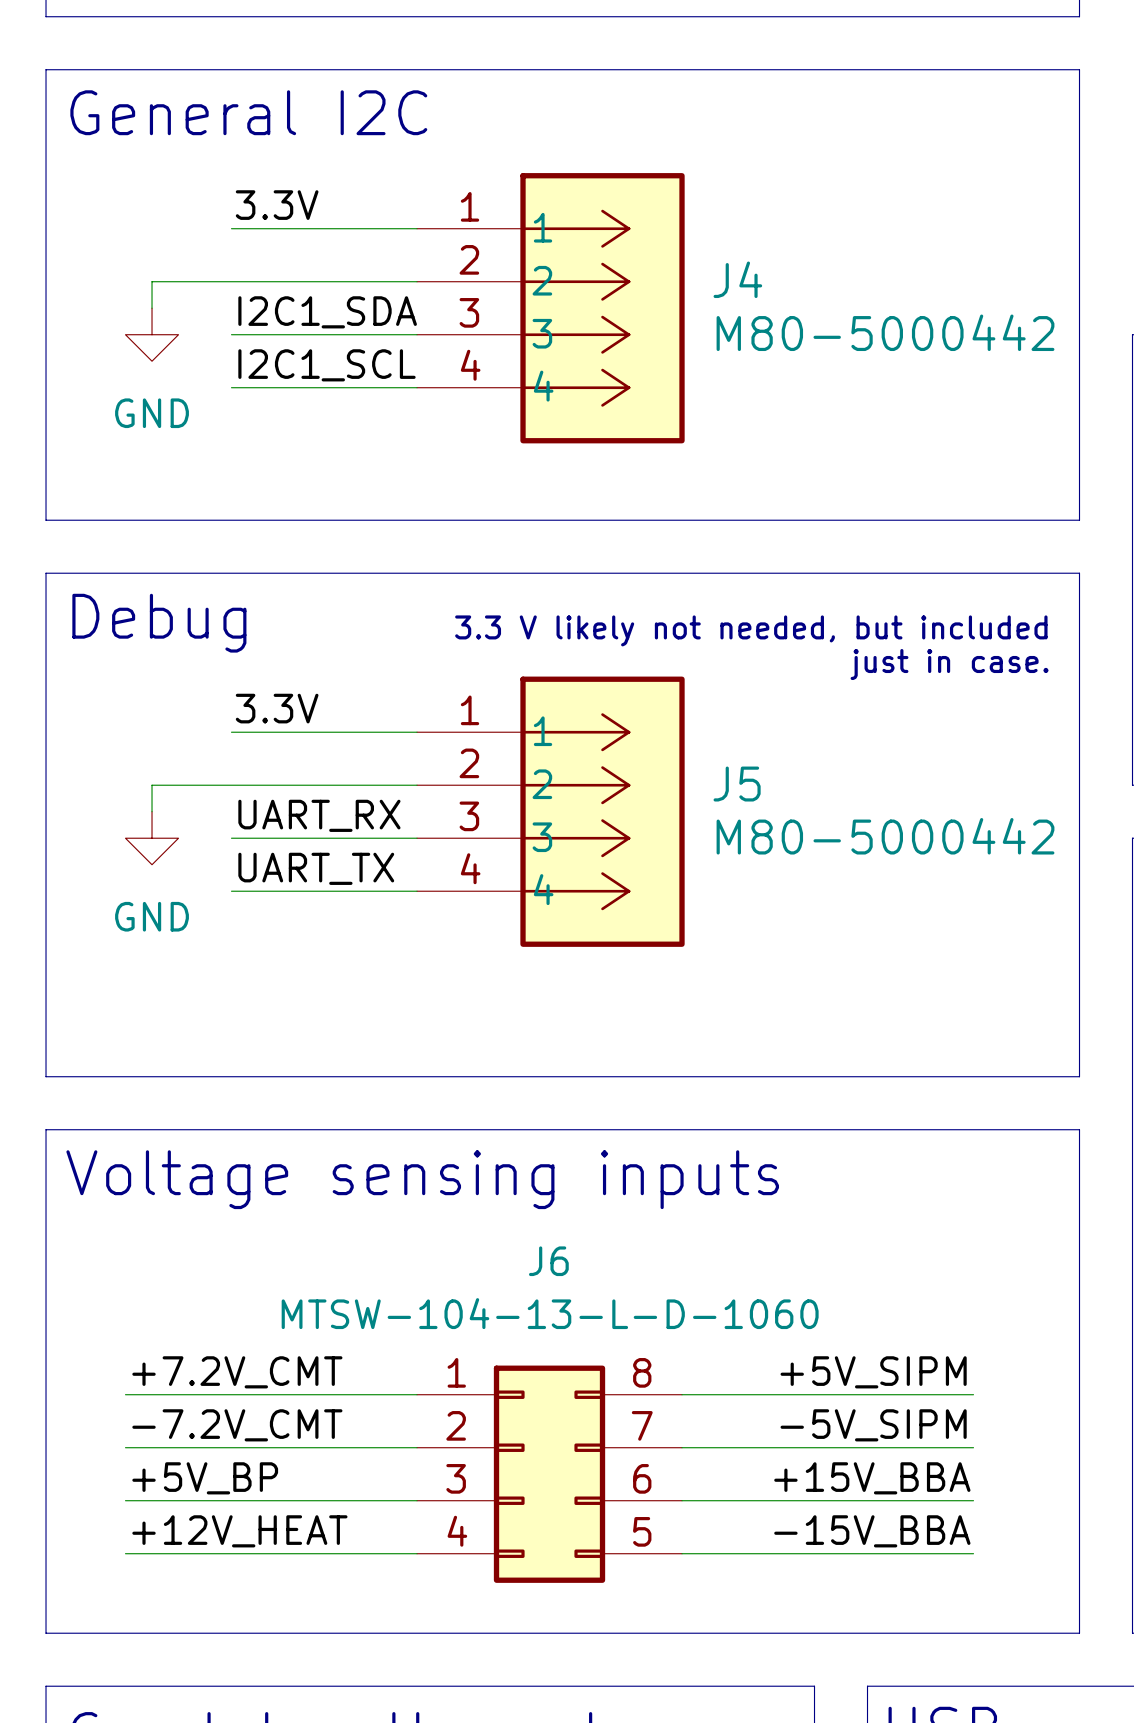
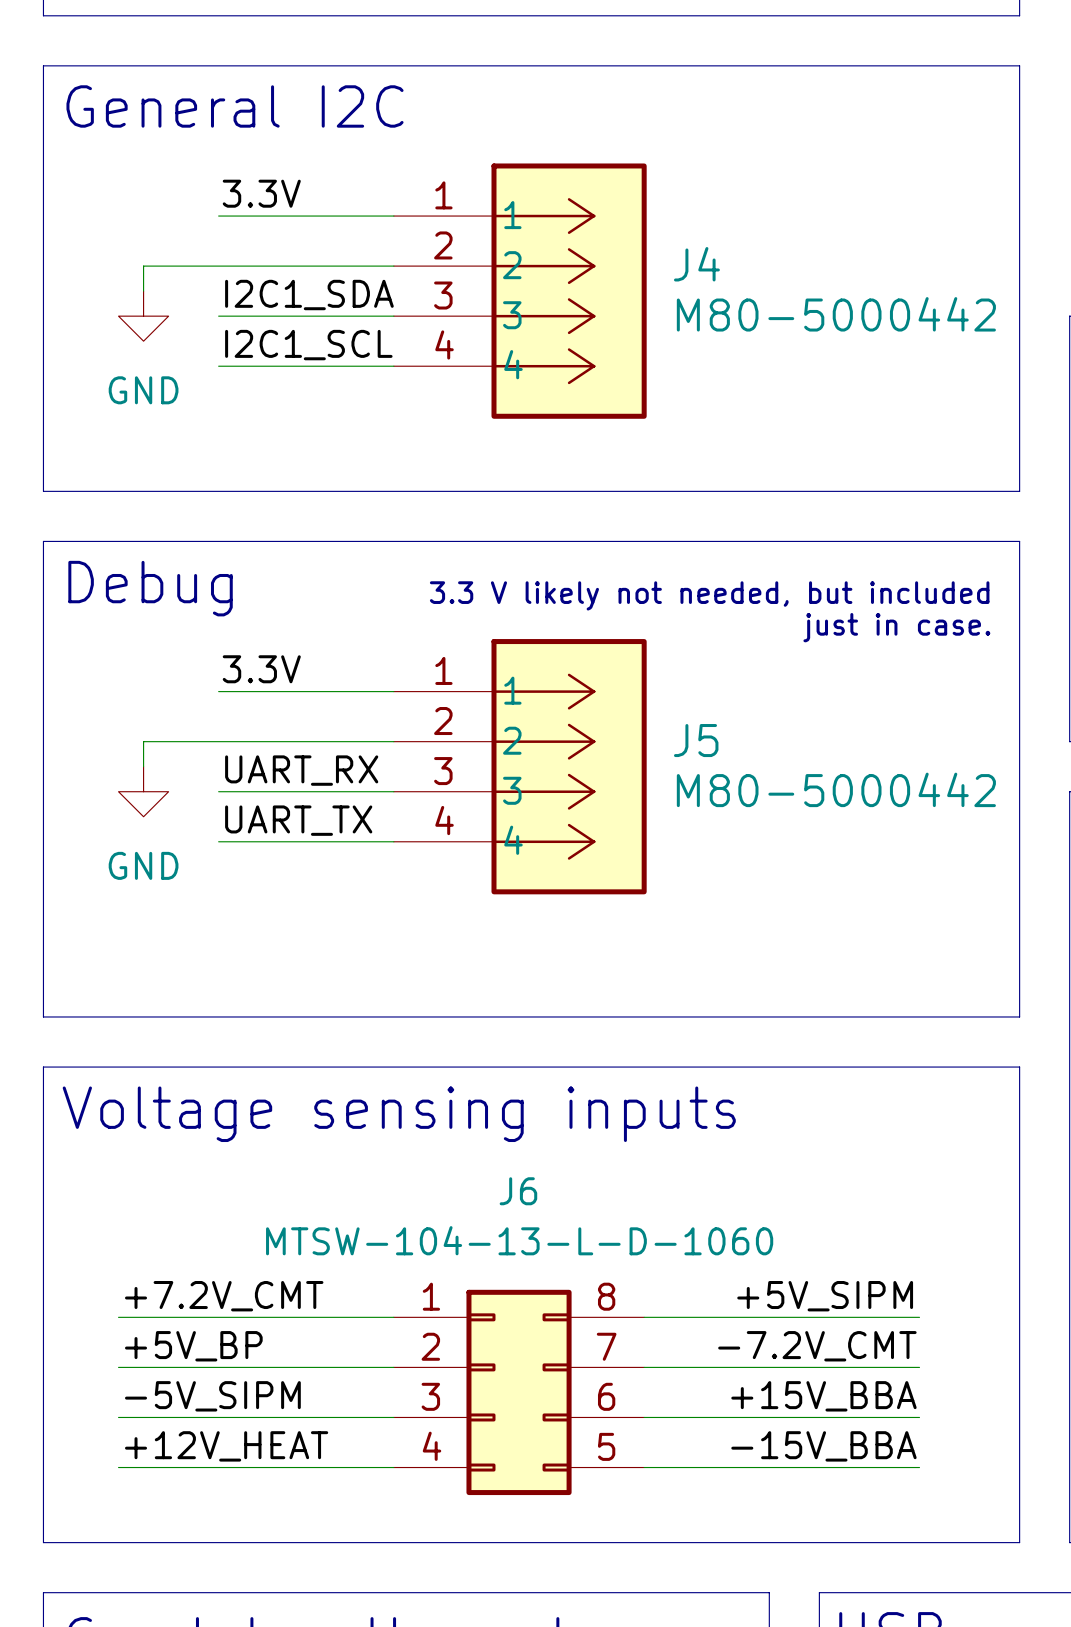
label: -7.2V_CMT (237, 1425) -> +5V_BP (193, 1346)
label: -5V_SIPM (873, 1425) -> -7.2V_CMT (817, 1346)
label: +5V_BP (205, 1478) -> -5V_SIPM (212, 1396)

